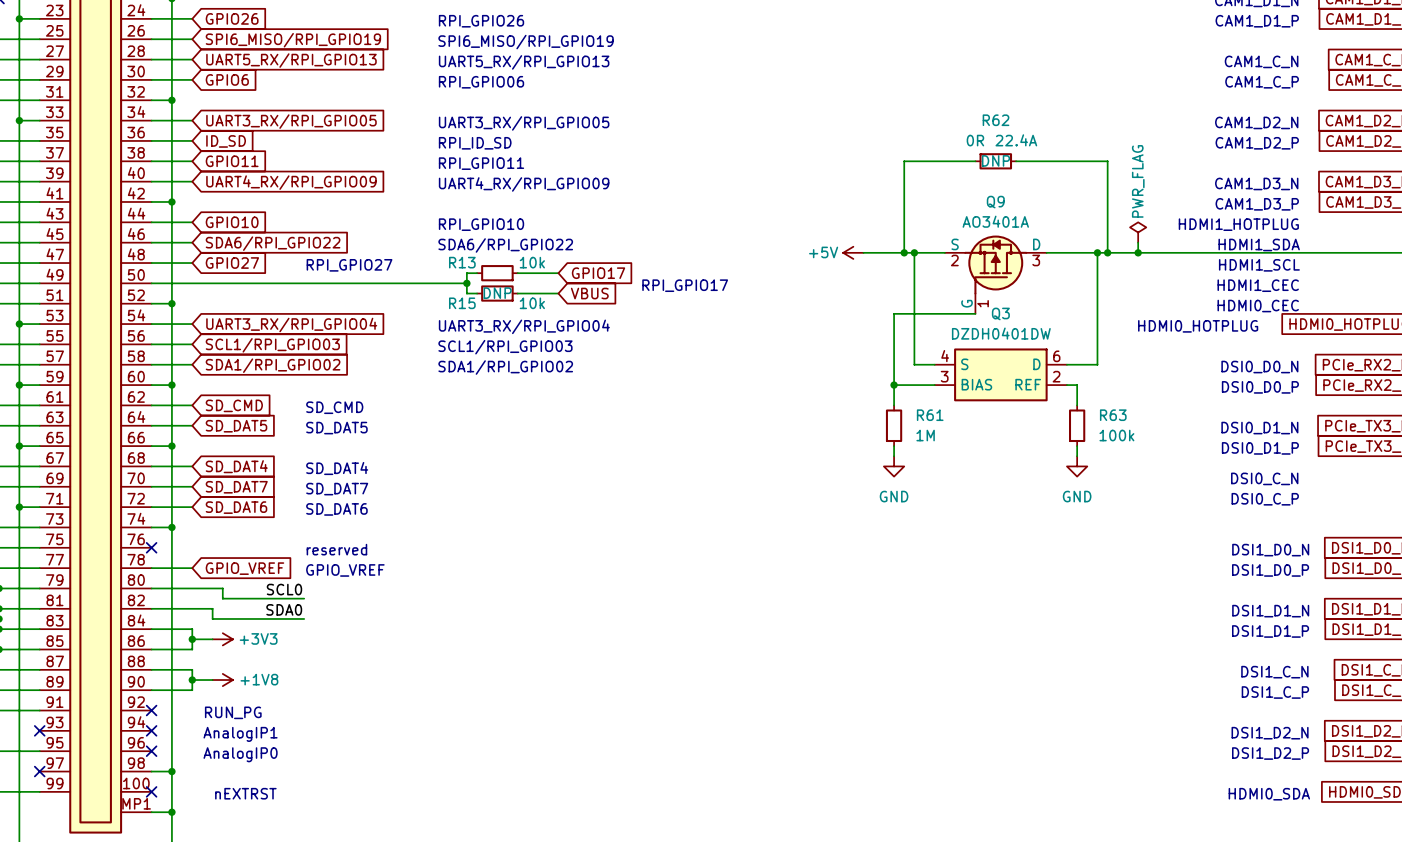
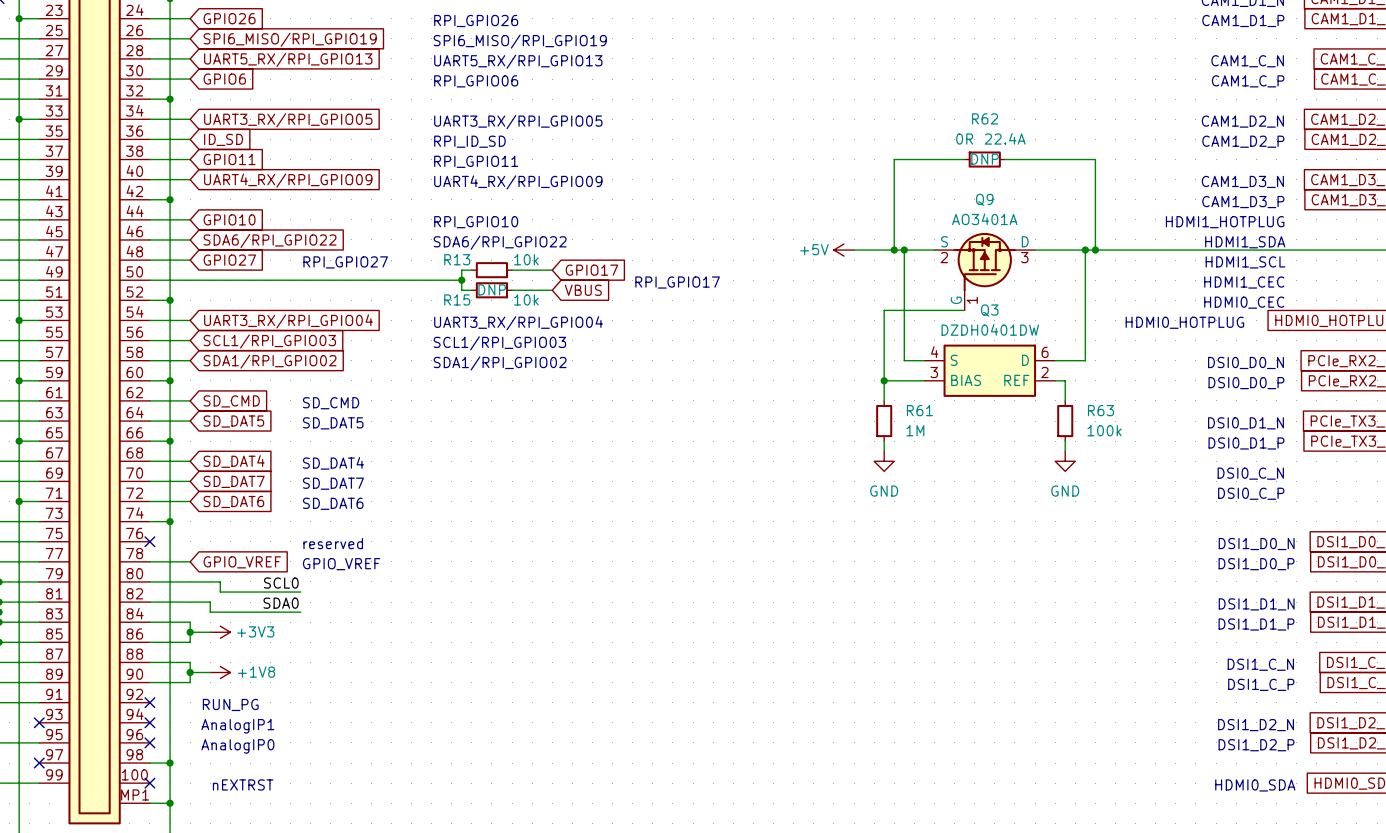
power symbol: PWR_FLAG (1138, 232) -> none
wire: (1138, 242) (1138, 252) -> none
junction: (1138, 252) -> none

